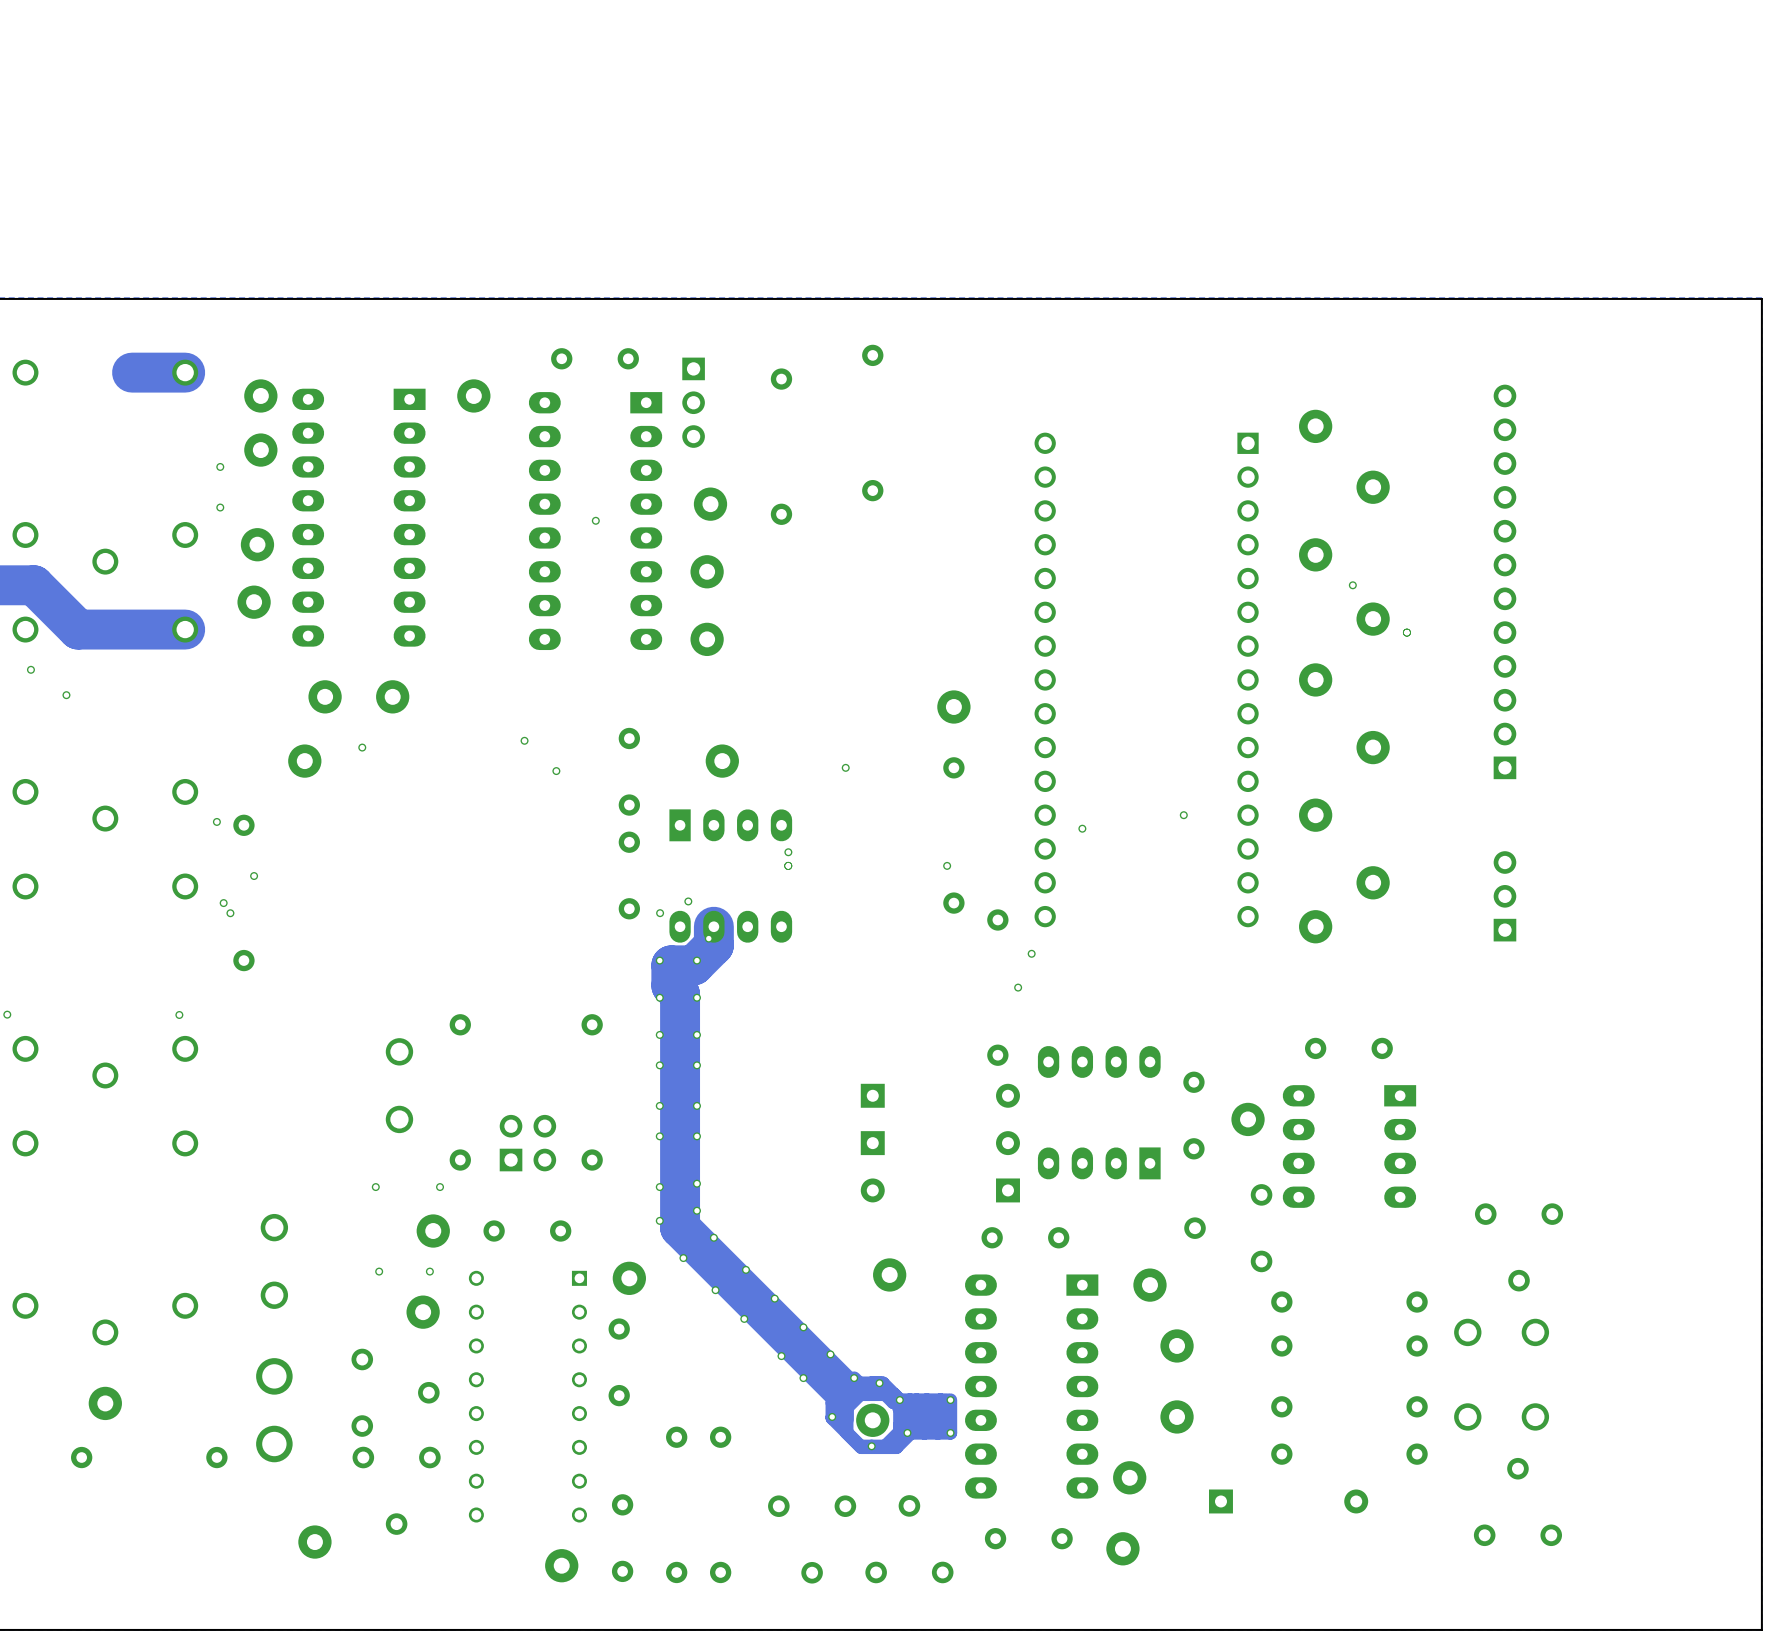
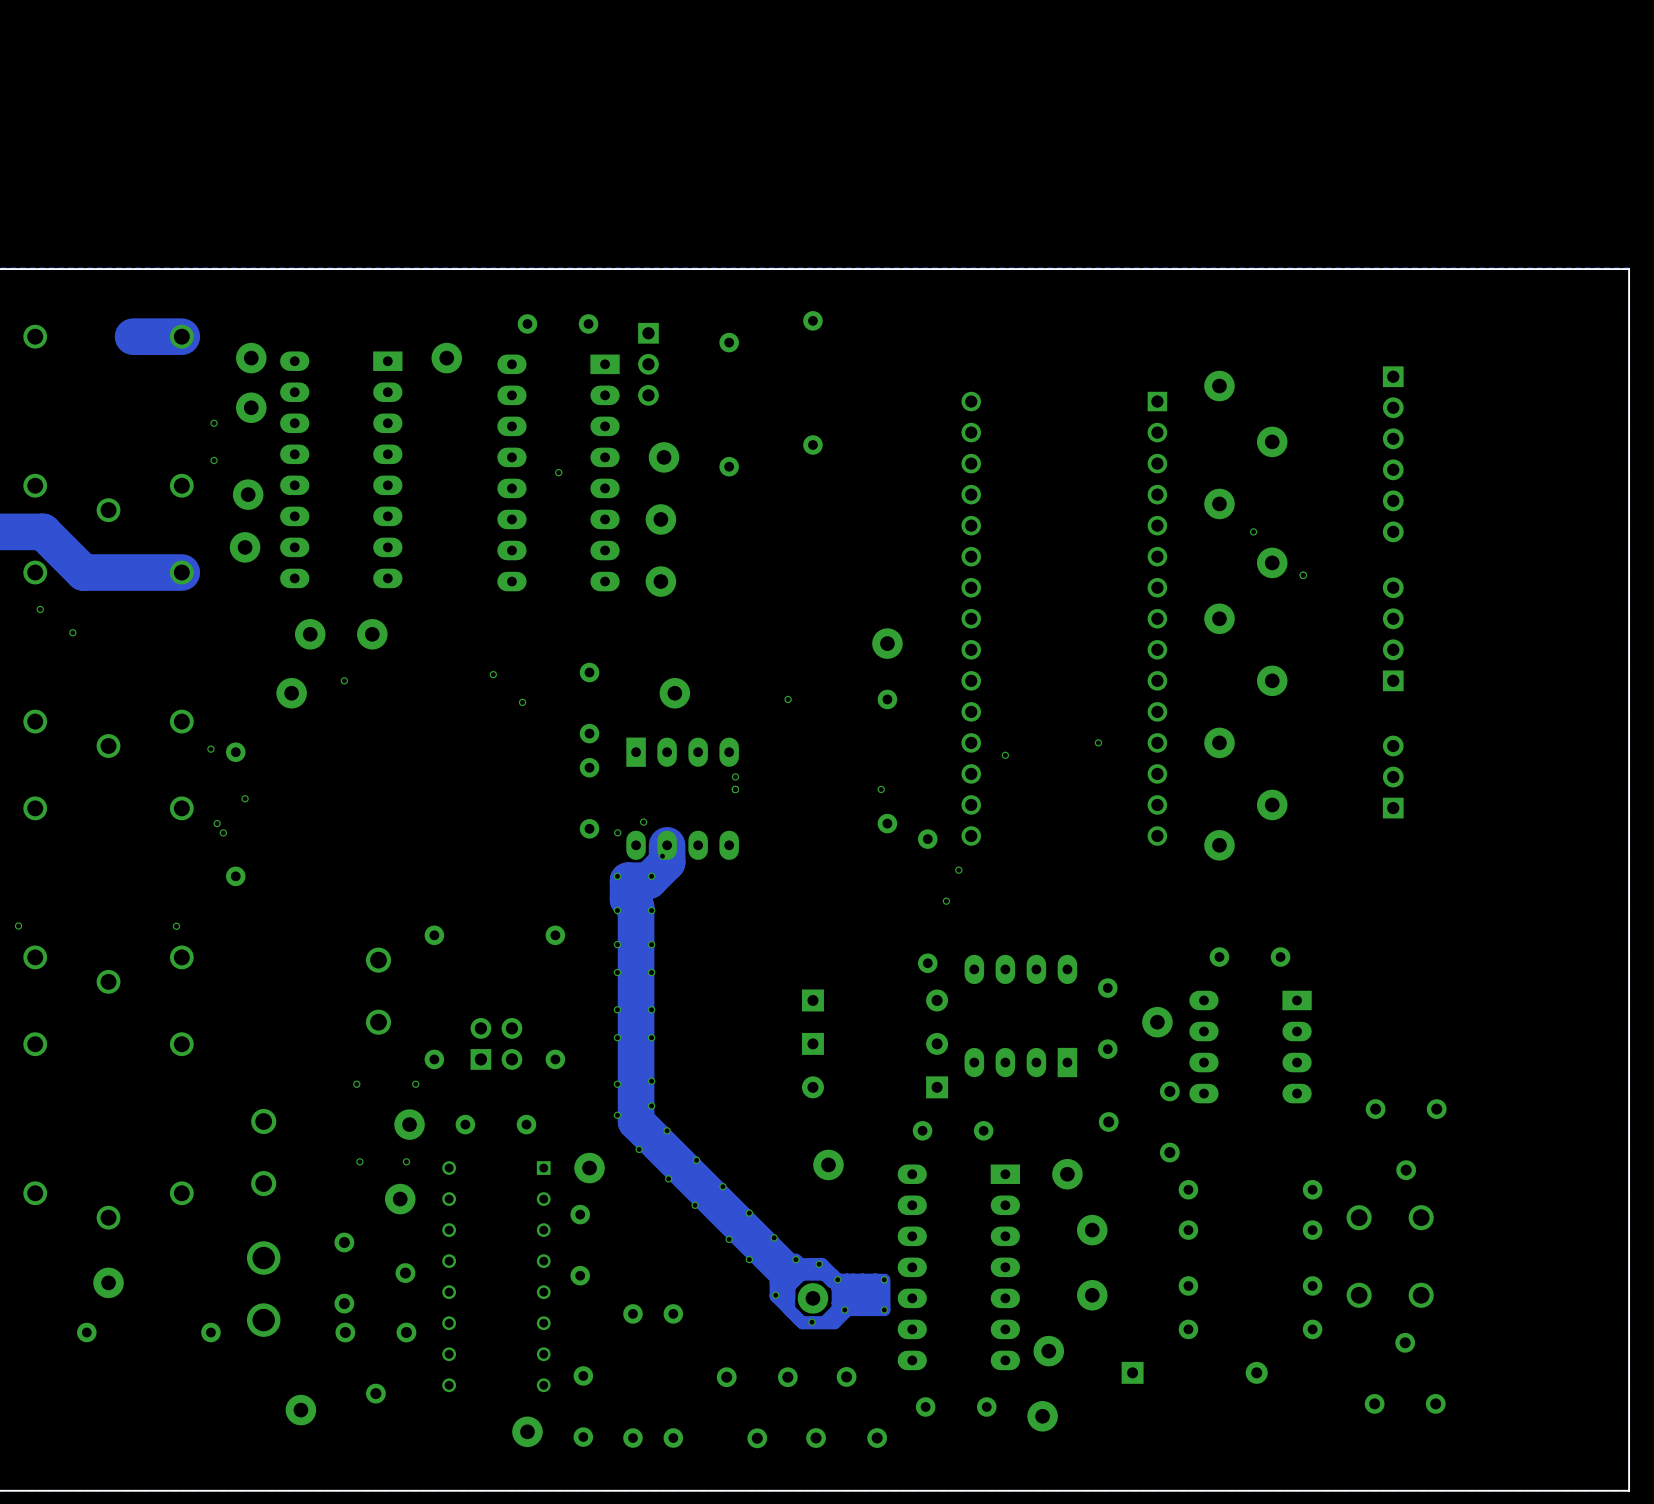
part: none -> (1393, 454)
part: (1504, 581) -> none
part: none -> (1393, 634)
part position: (1504, 896) -> (1393, 777)

